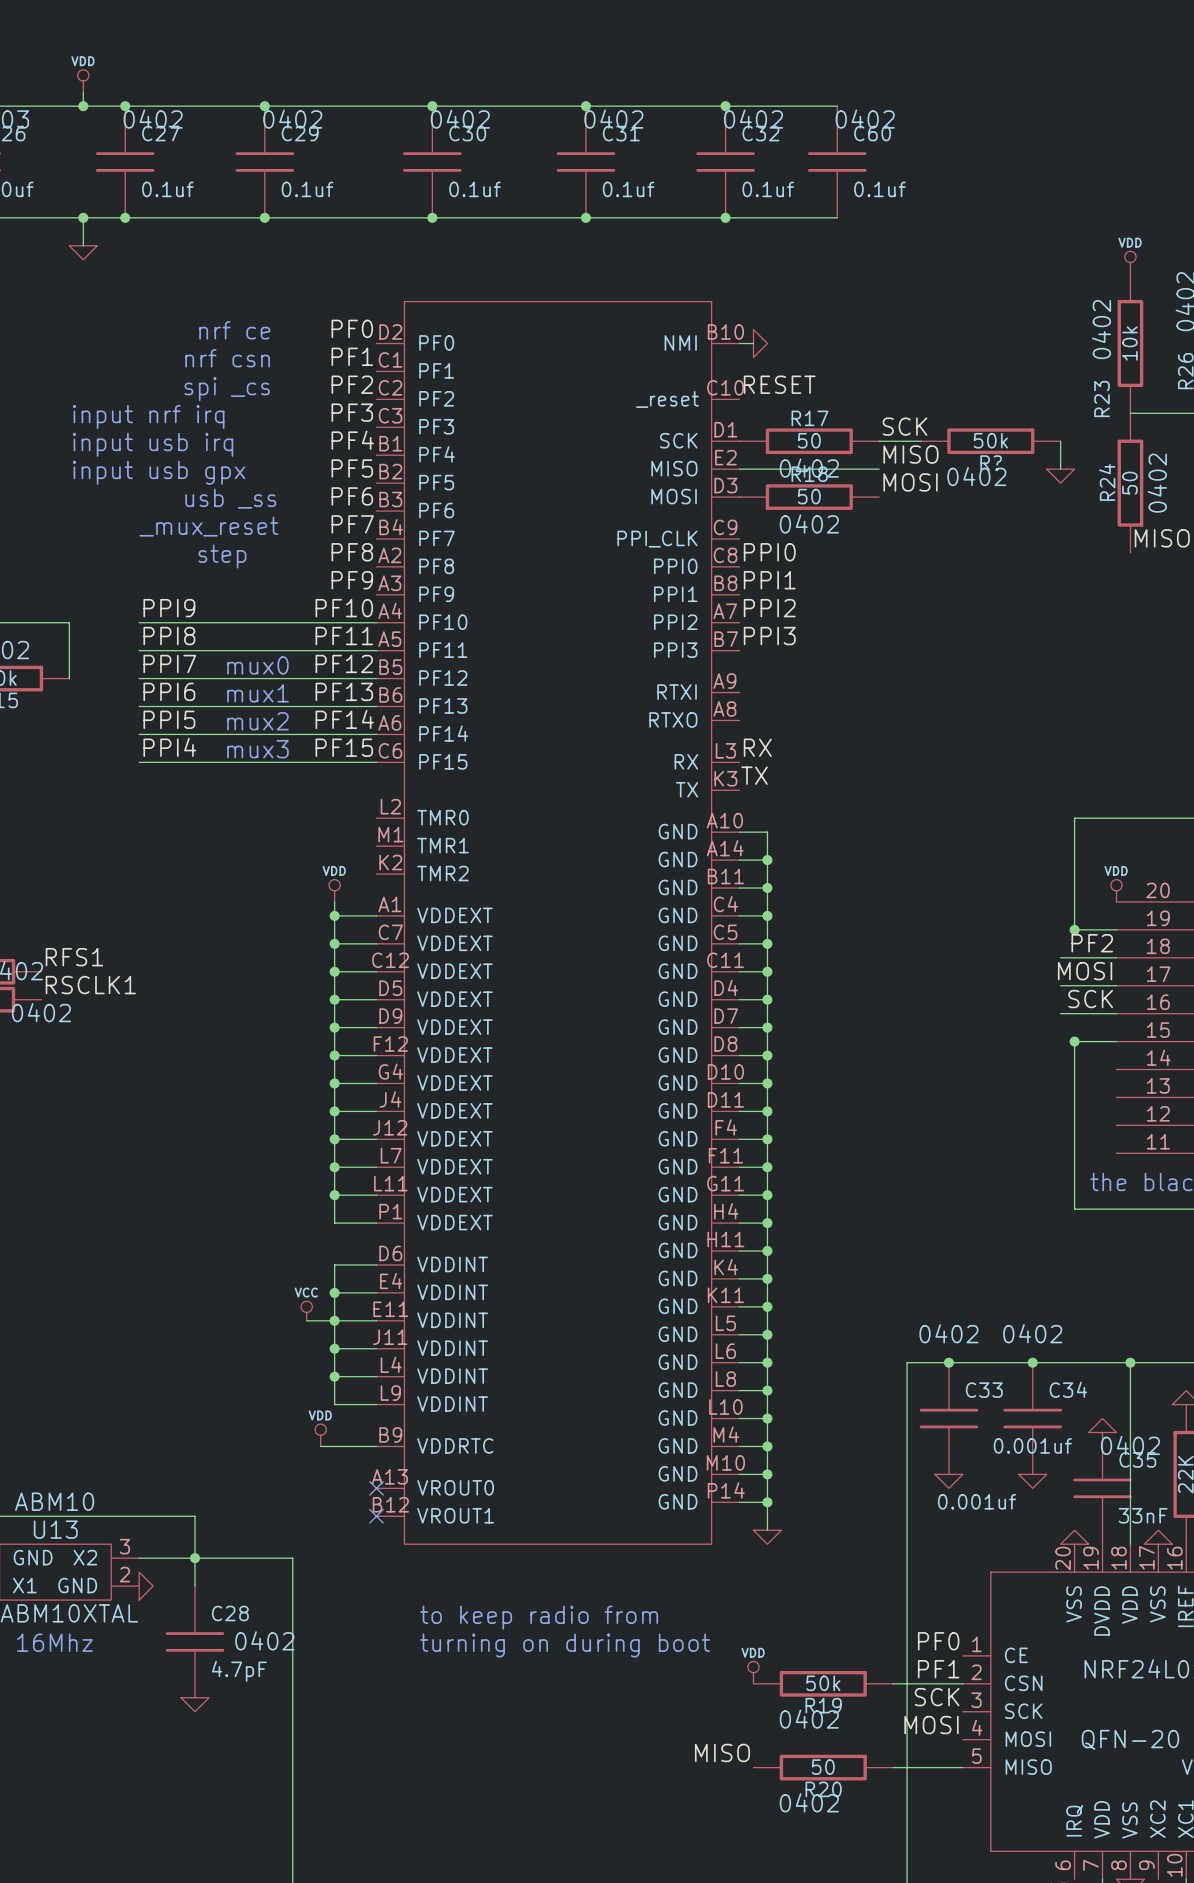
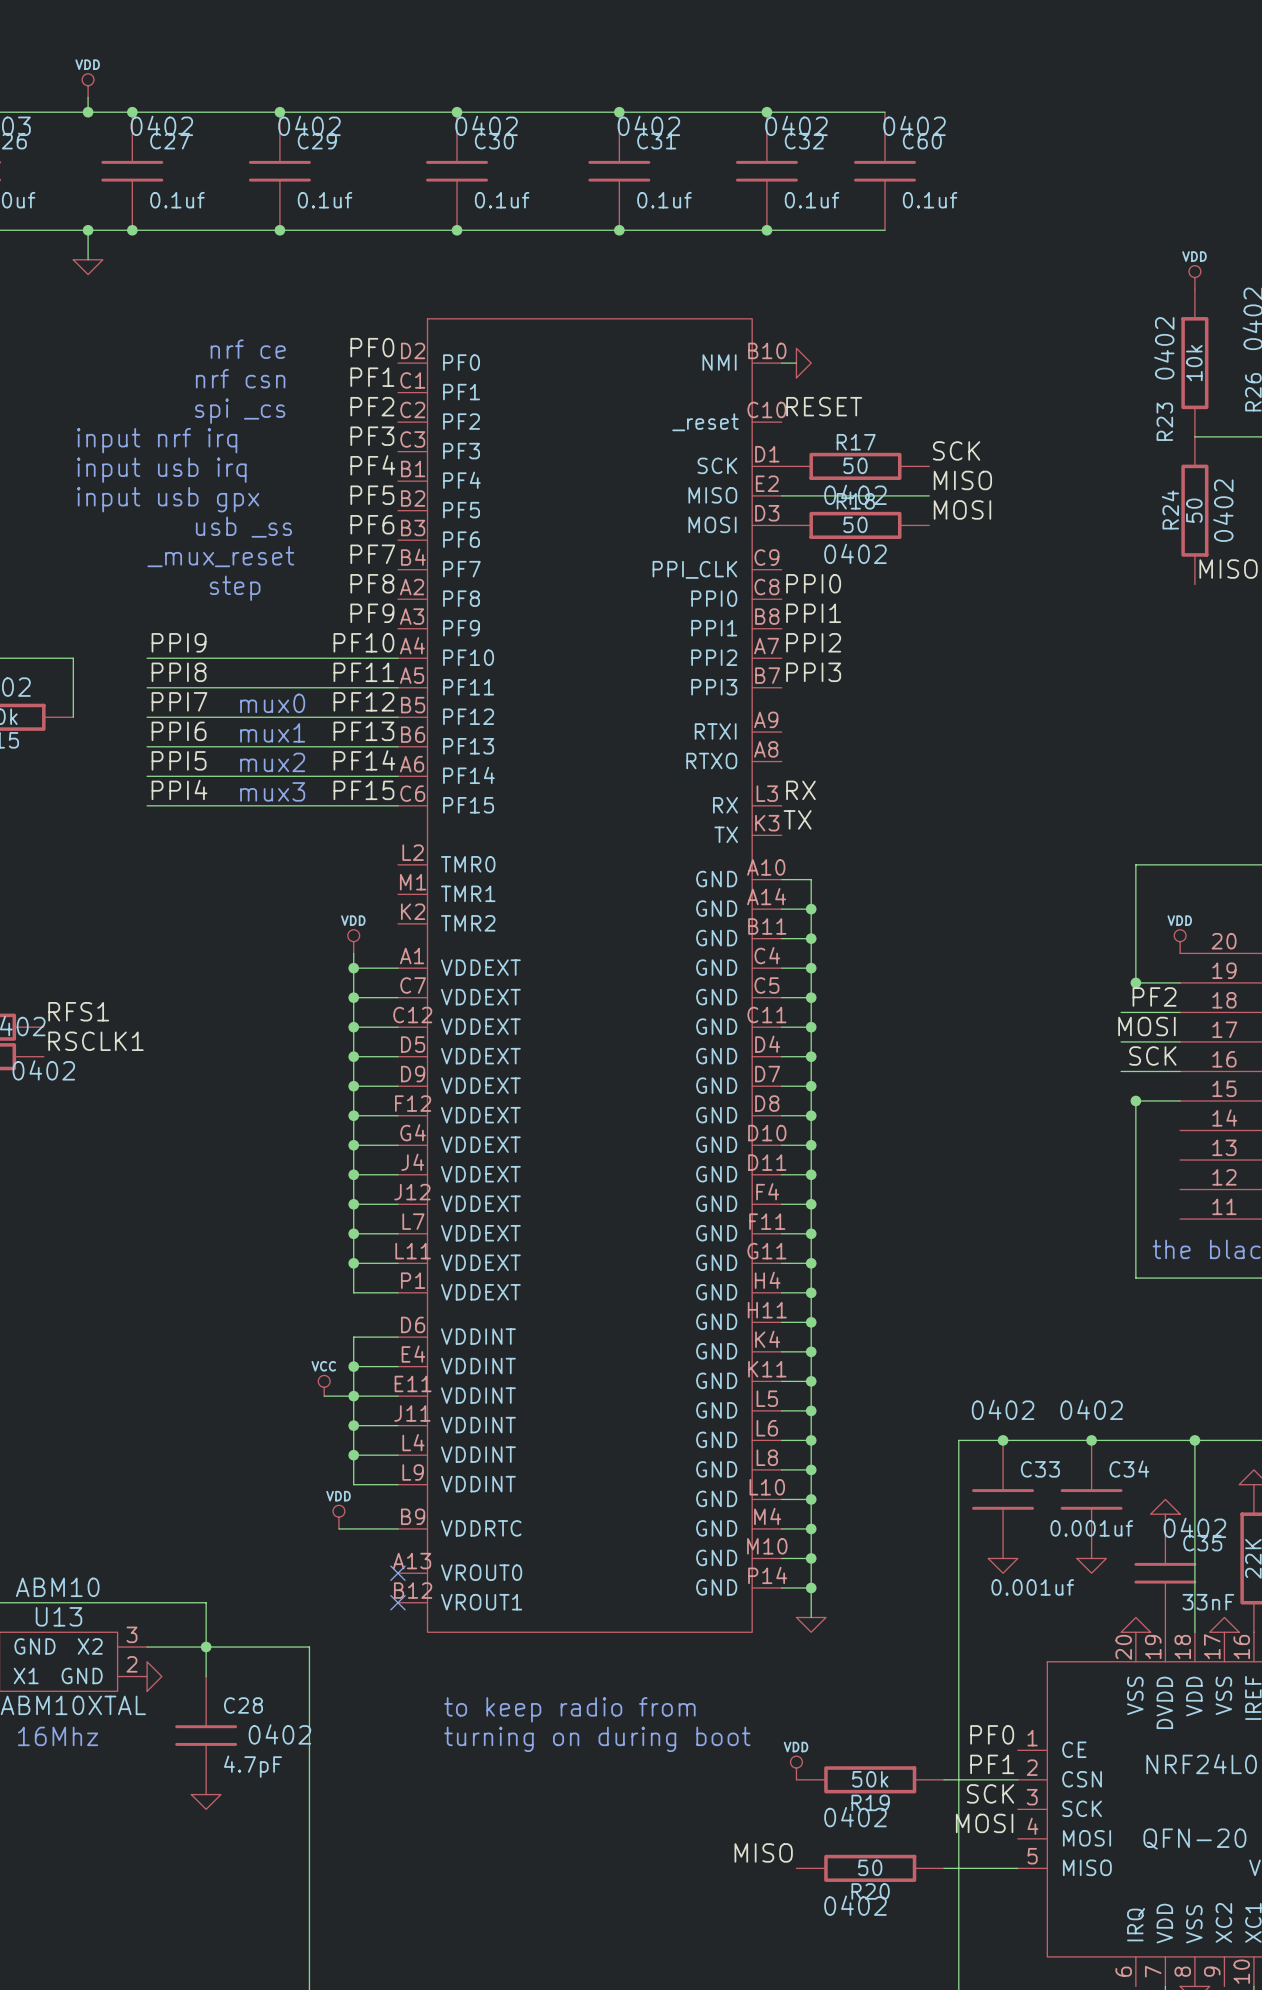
wire: (879, 441) (921, 441) -> none
R?: 50k (990, 441) -> none
wire: (1060, 441) (1060, 469) -> none
power symbol: (1060, 476) -> none

